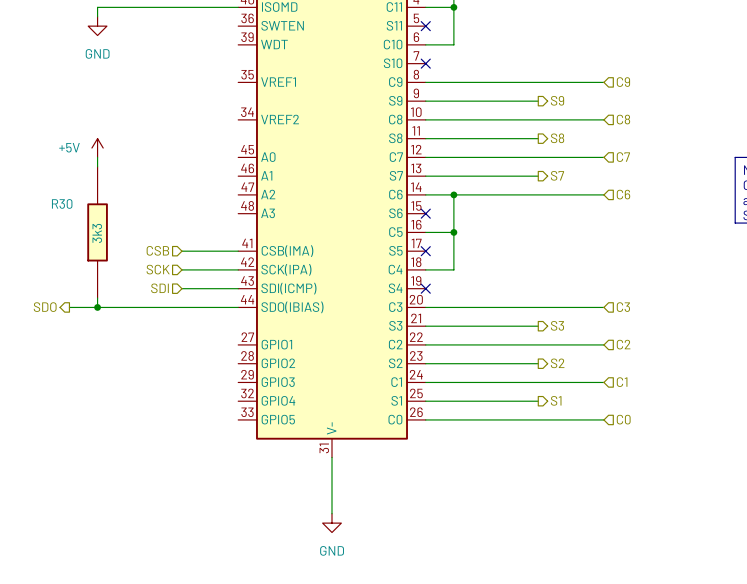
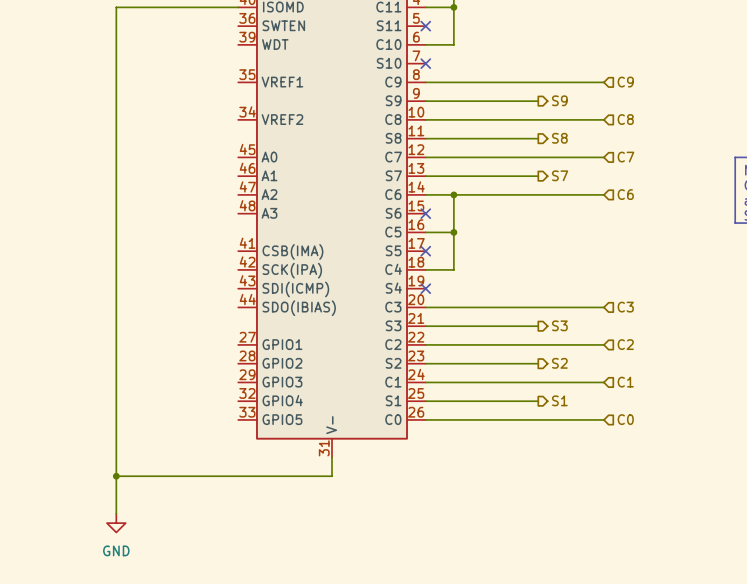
wire: (116, 7) (97, 7) (97, 16) -> (116, 7) (116, 513)
power symbol: GND (97, 26) -> none
power symbol: +5V (97, 148) -> none
wire: (97, 157) (97, 166) -> none
R30: 3k3 (97, 232) -> none
hierarchical label: CSB (157, 250) -> none
wire: (181, 251) (238, 251) -> none
hierarchical label: SCK (158, 269) -> none
wire: (181, 269) (238, 269) -> none
hierarchical label: SDI (159, 288) -> none
wire: (181, 288) (238, 288) -> none
wire: (97, 298) (97, 307) -> none
hierarchical label: SDO (45, 307) -> none
wire: (69, 307) (238, 307) -> none
junction: (97, 307) -> none
junction: none -> (116, 476)
wire: (331, 476) (331, 513) -> (331, 476) (116, 476)
power symbol: none -> GND (116, 523)
power symbol: GND (331, 523) -> none

